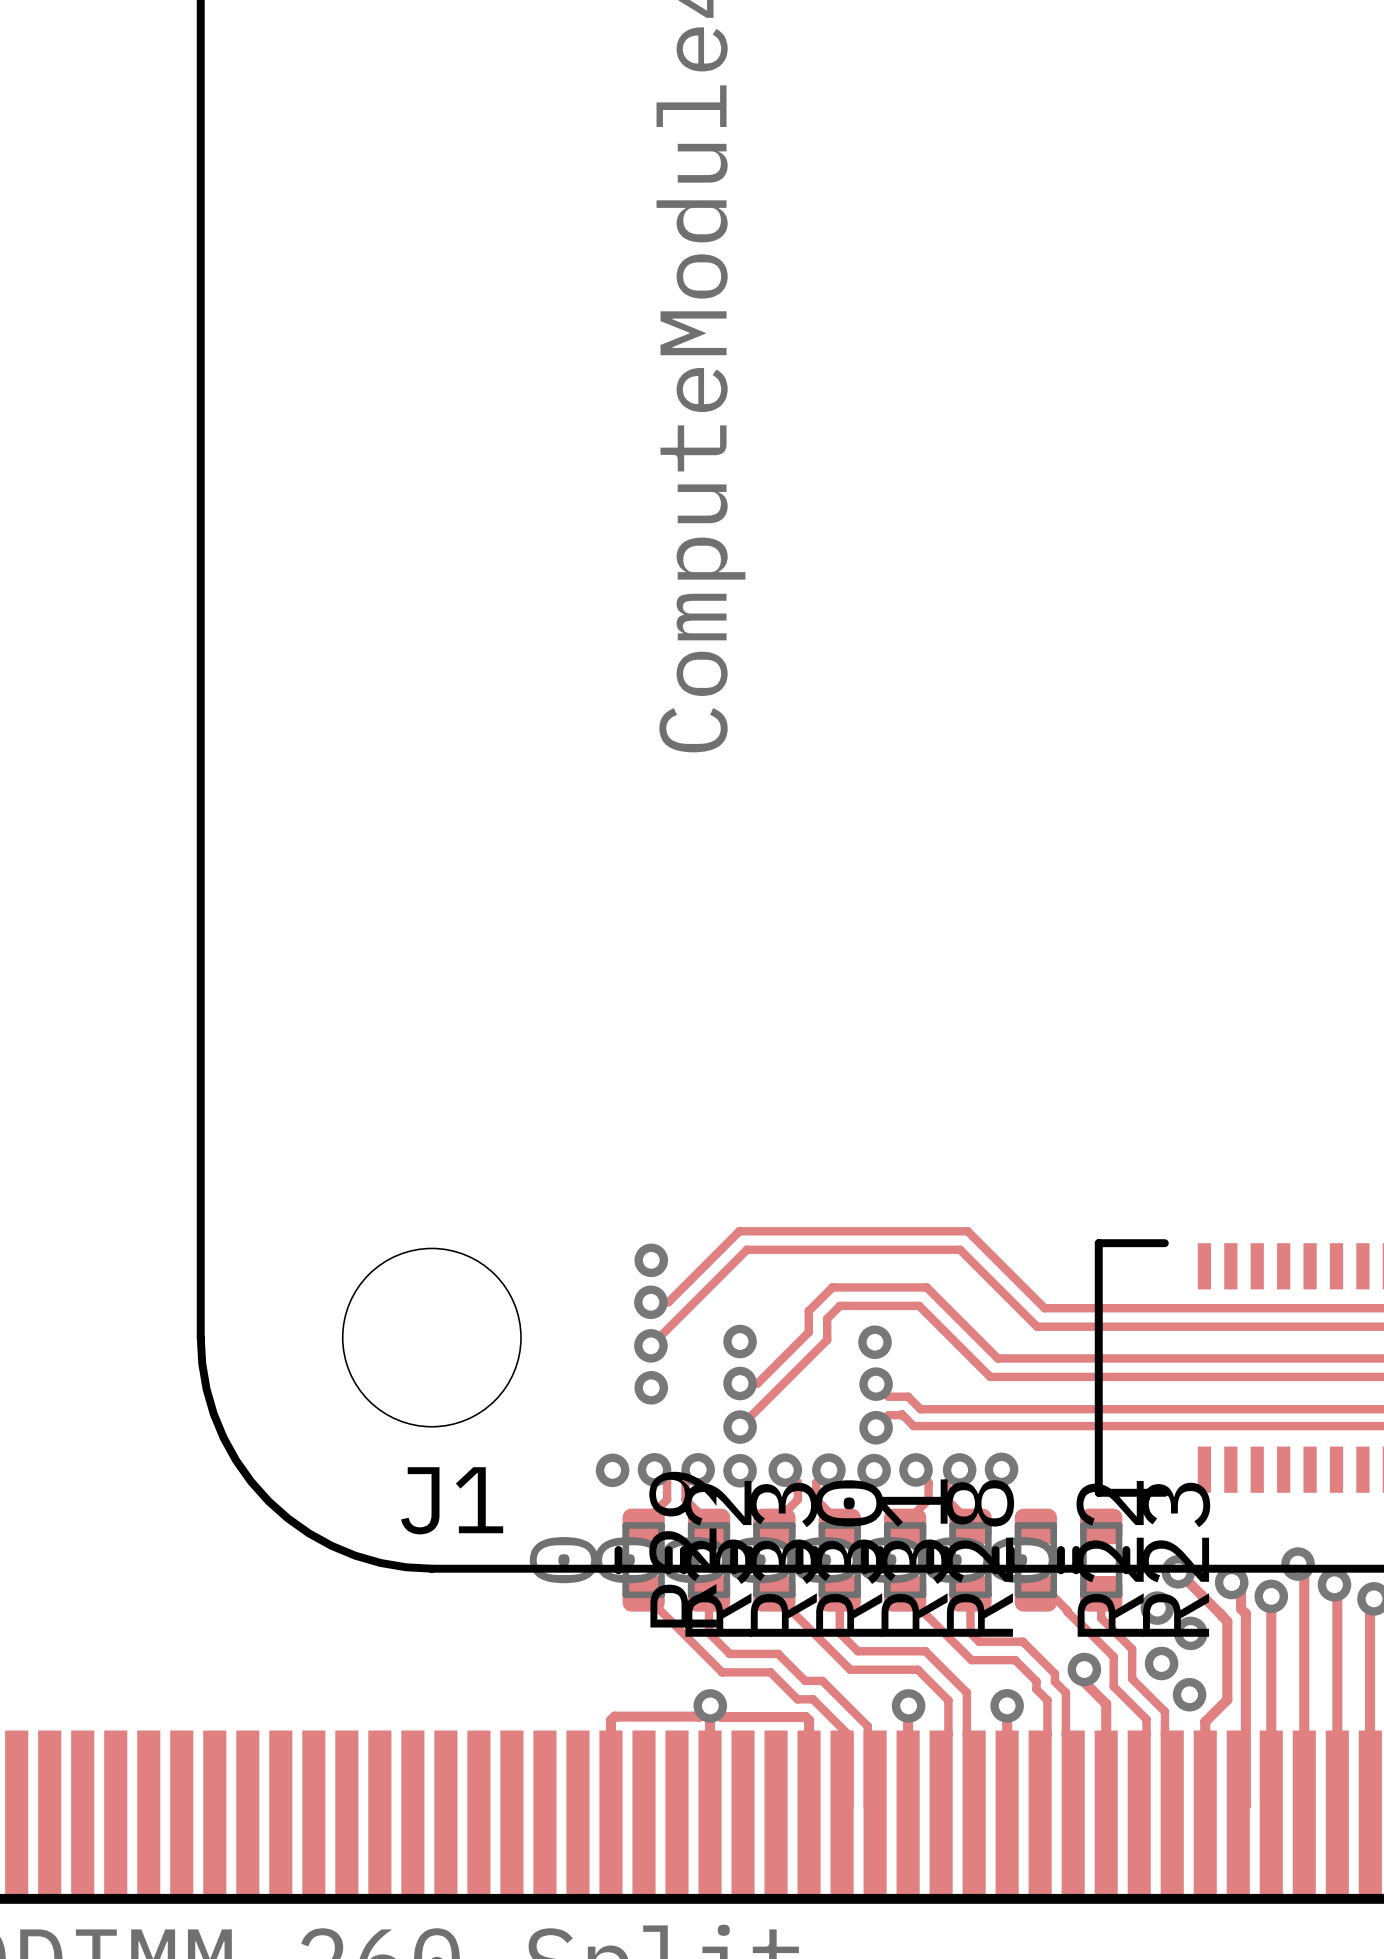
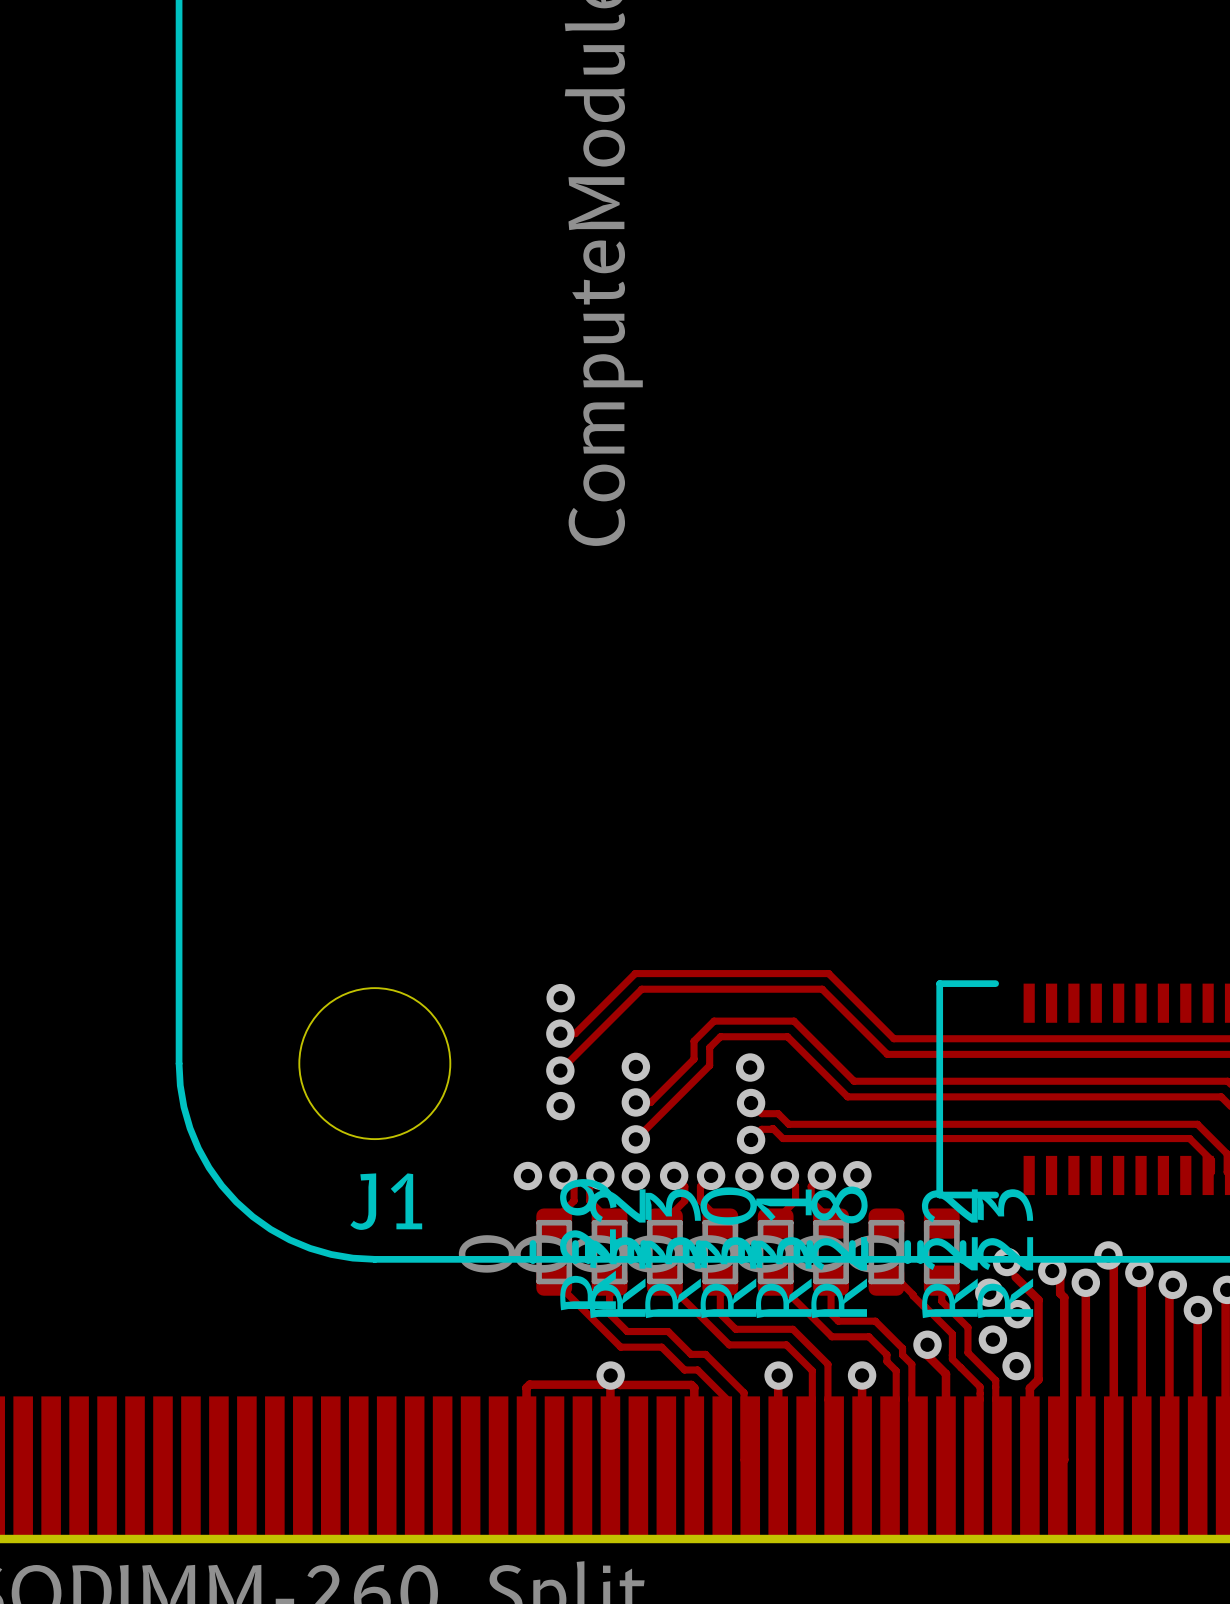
track: (1178, 1571) (1227, 1621) (1227, 1699) (1205, 1721) -> (1015, 1277) (1038, 1300) (1038, 1379) (1029, 1388)

